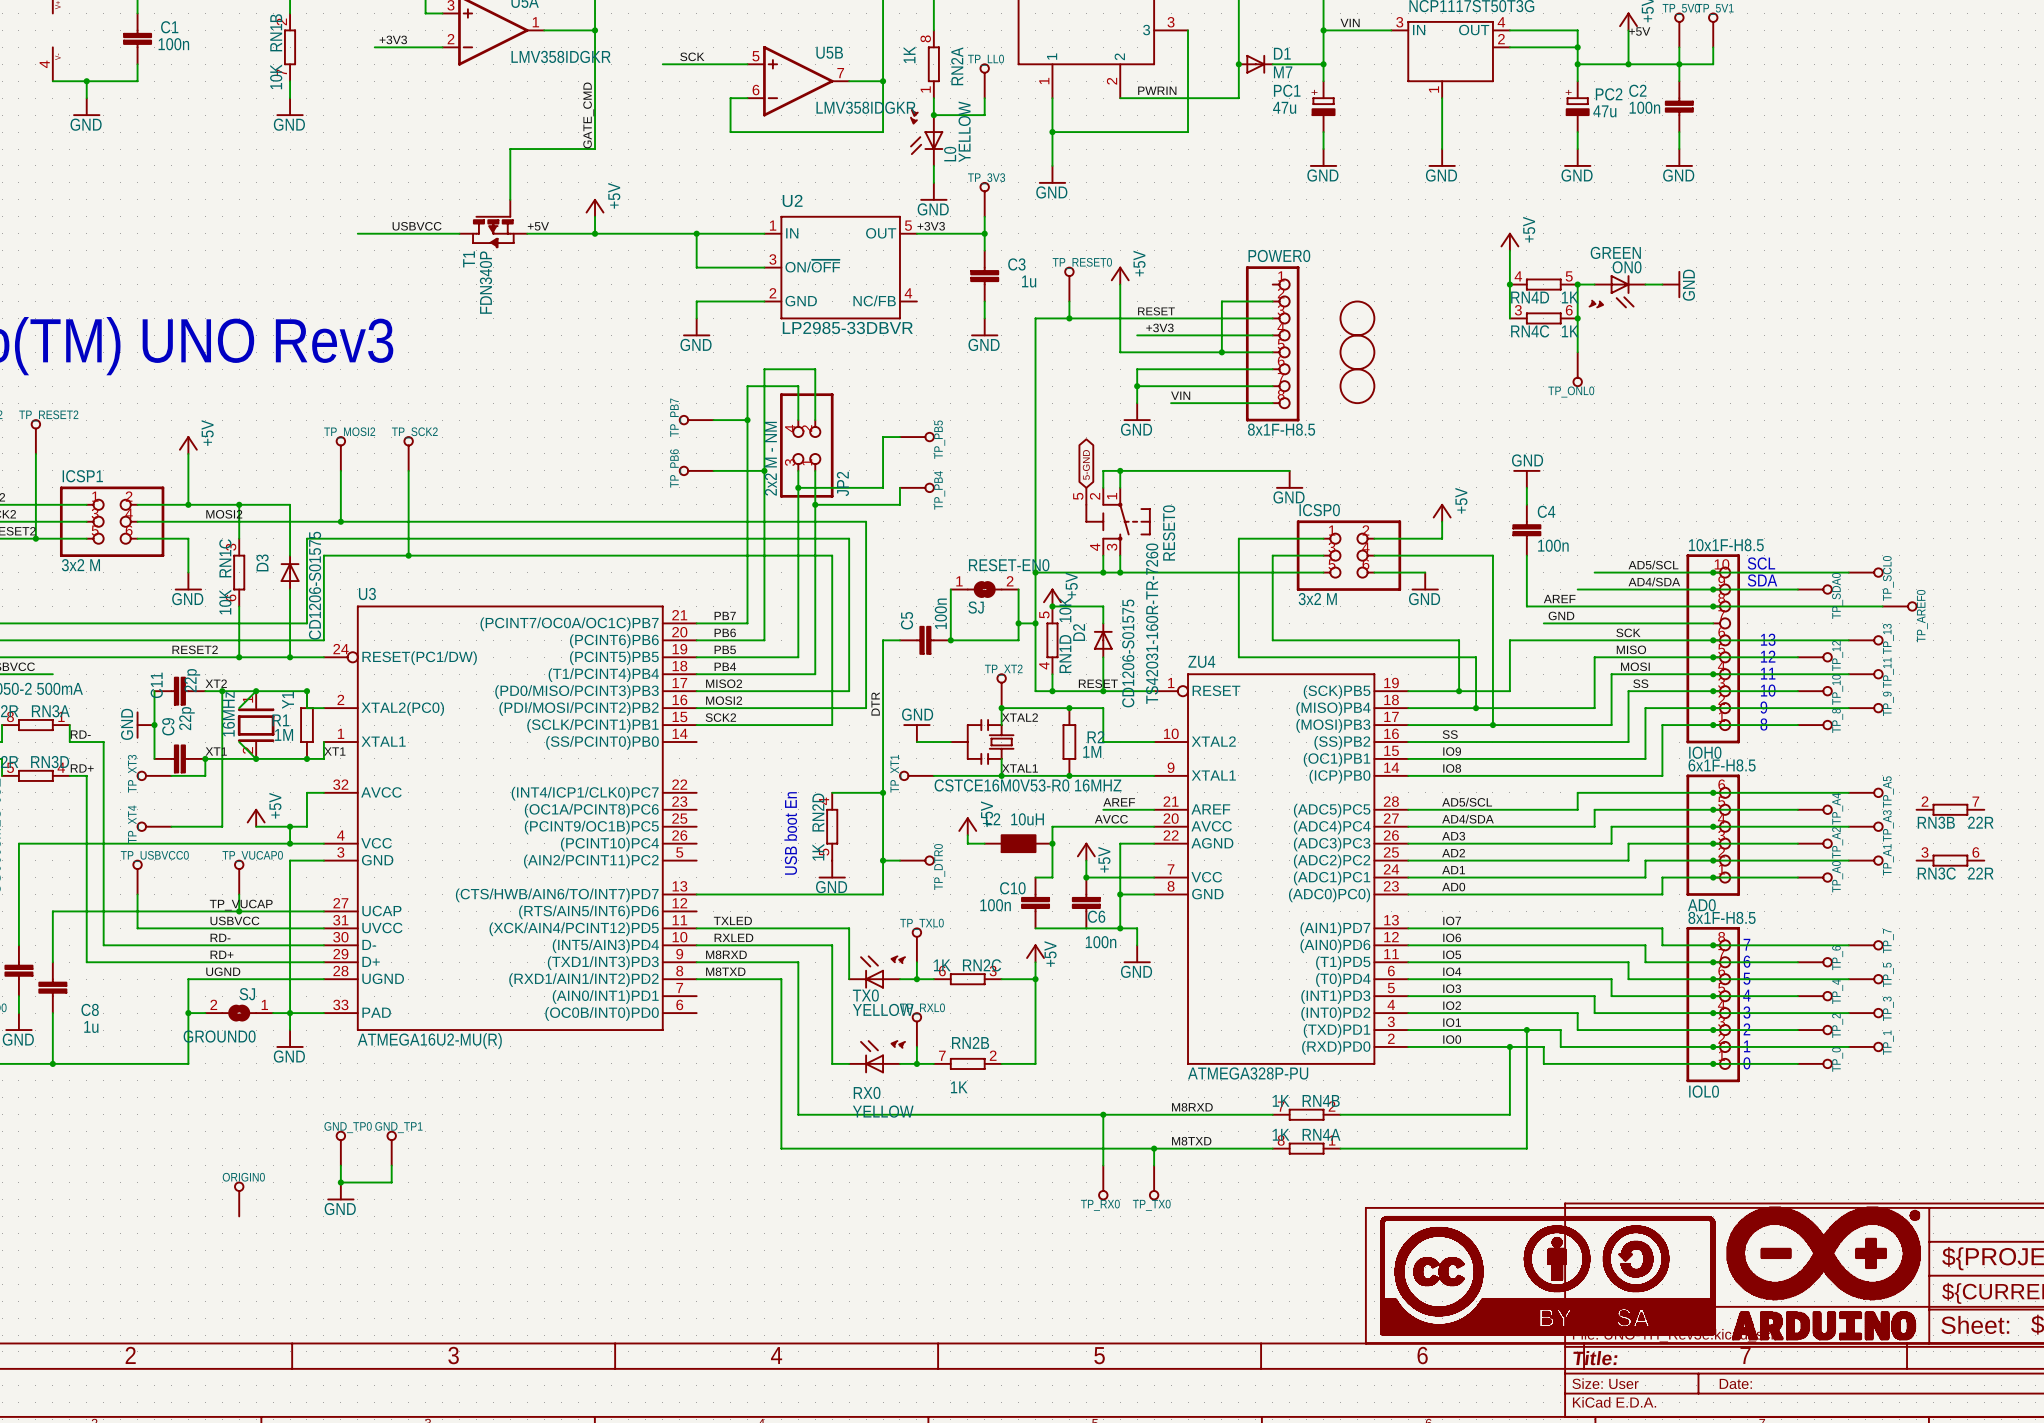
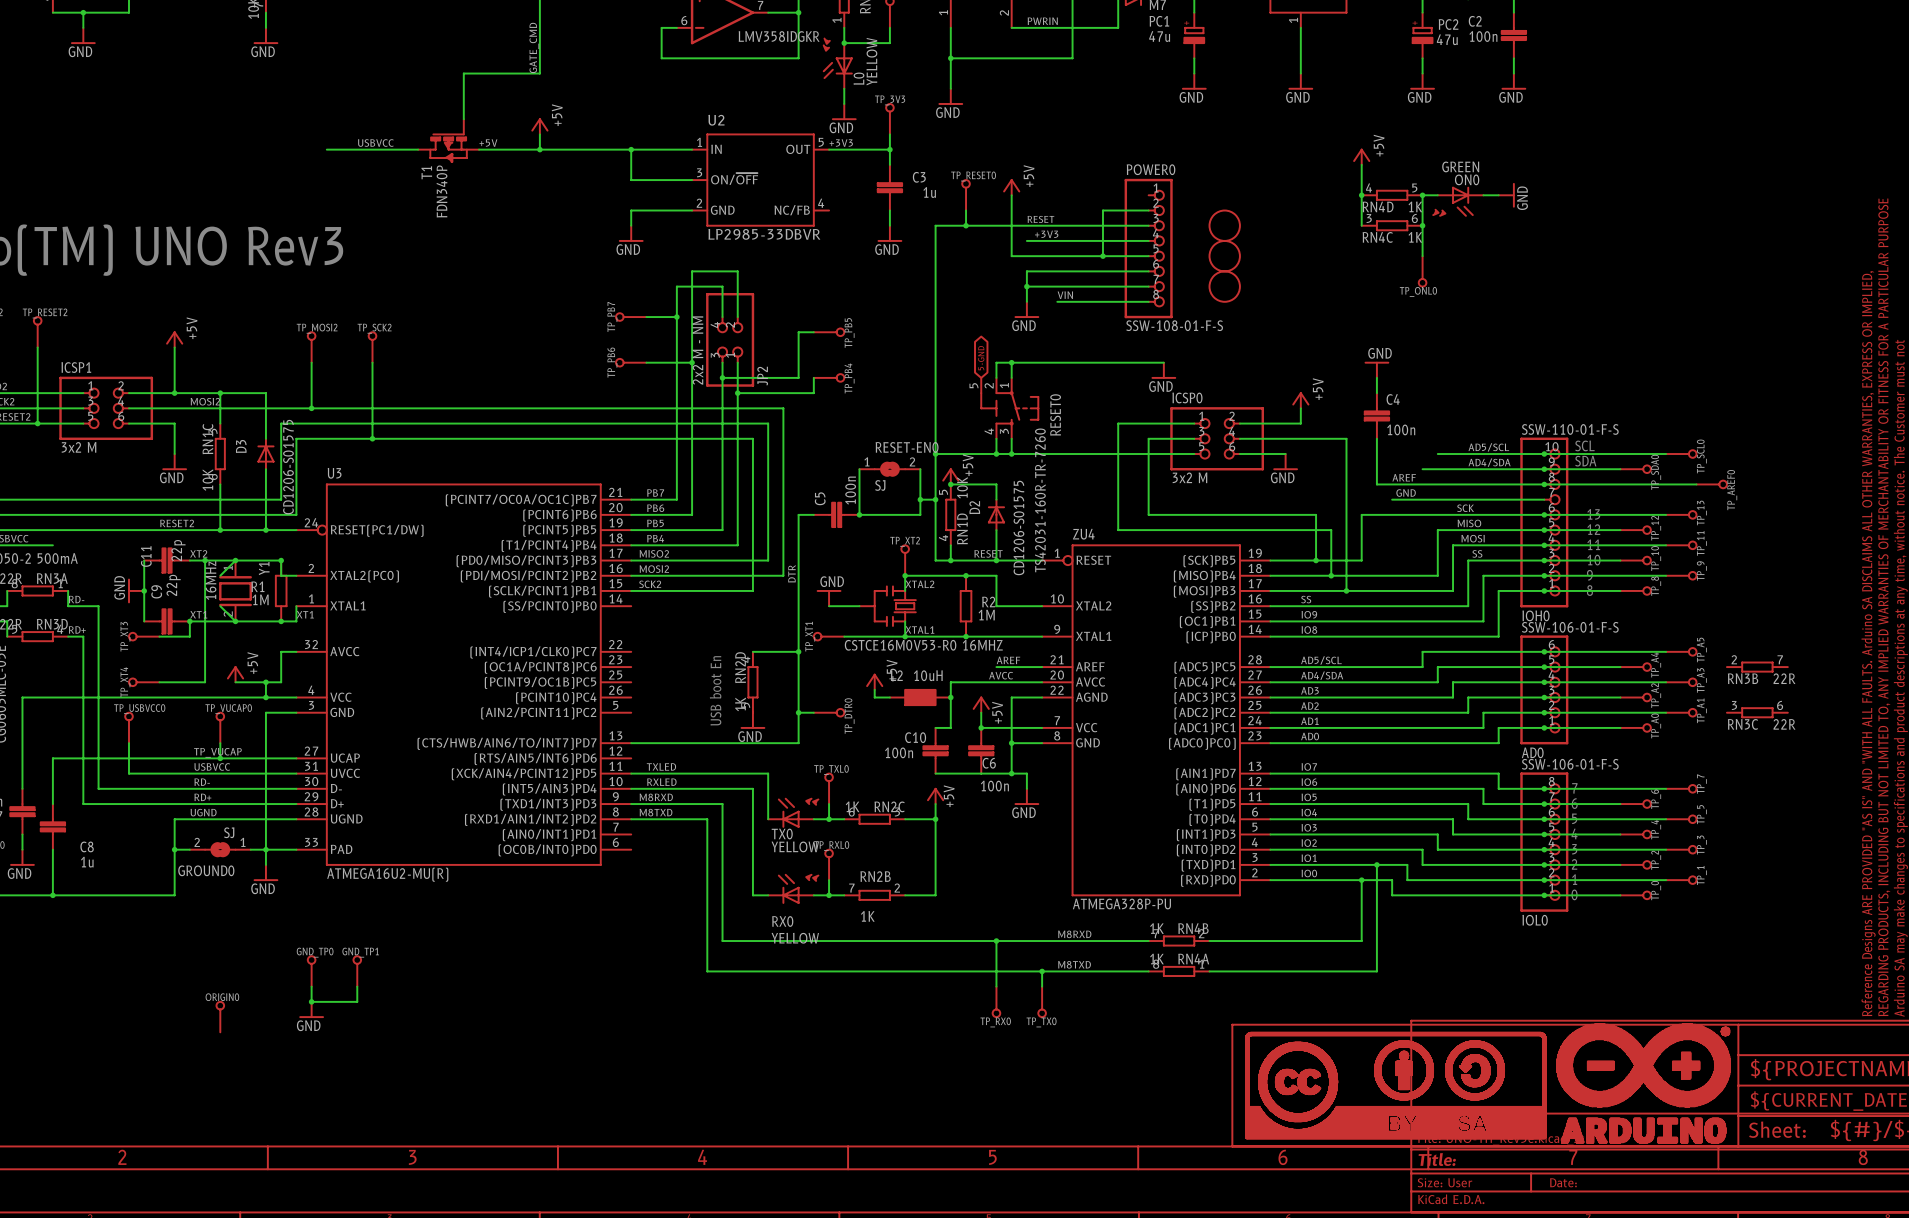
POWER0 value: 8x1F-H8.5 (1281, 429) -> SSW-108-01-F-S (1174, 325)
IOH0 value: 10x1F-H8.5 (1726, 545) -> SSW-110-01-F-S (1570, 429)
AD0 value: 6x1F-H8.5 (1722, 765) -> SSW-106-01-F-S (1570, 627)
IOL0 value: 8x1F-H8.5 (1722, 917) -> SSW-106-01-F-S (1570, 764)

